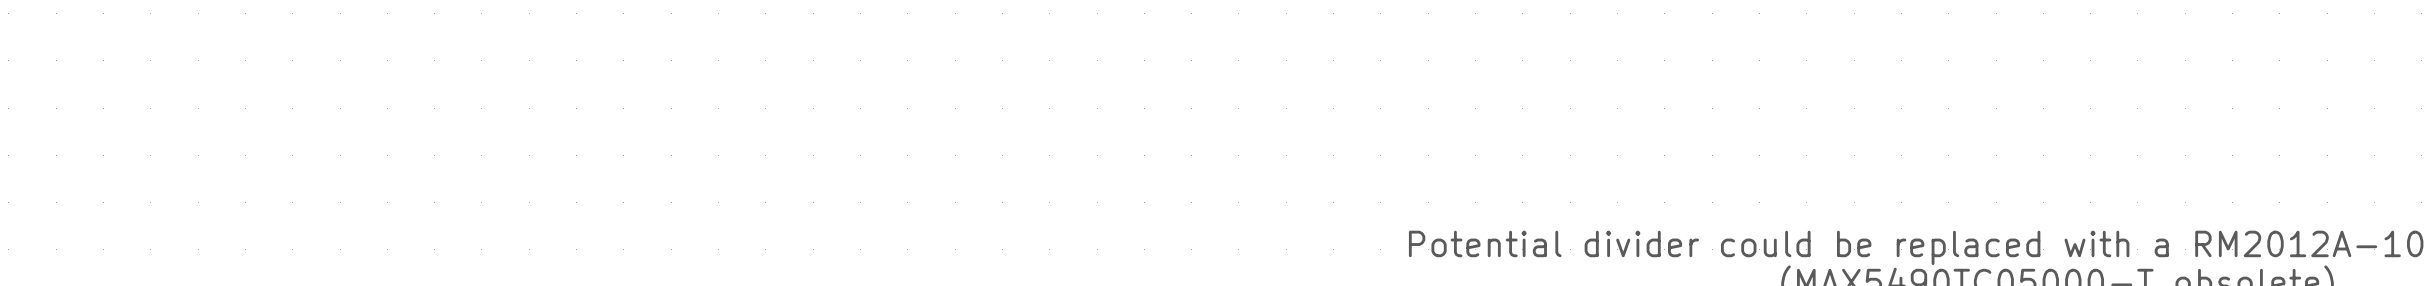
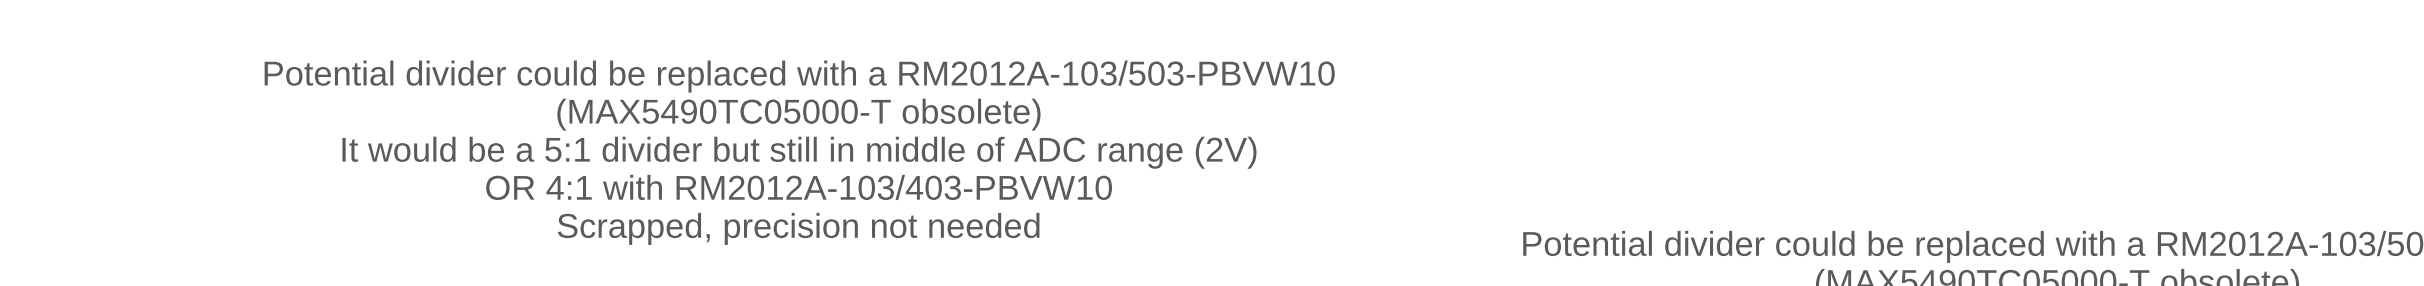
text: none -> Potential divider could be replaced with a RM2012A-103/503-PBVW10 (799, 76)
text: none -> (MAX5490TC05000-T obsolete) (798, 114)
text: none -> It would be a 5:1 divider but still in middle of ADC range (2V) (799, 152)
text: none -> OR 4:1 with RM2012A-103/403-PBVW10 (799, 187)
text: none -> Scrapped, precision not needed (798, 228)

